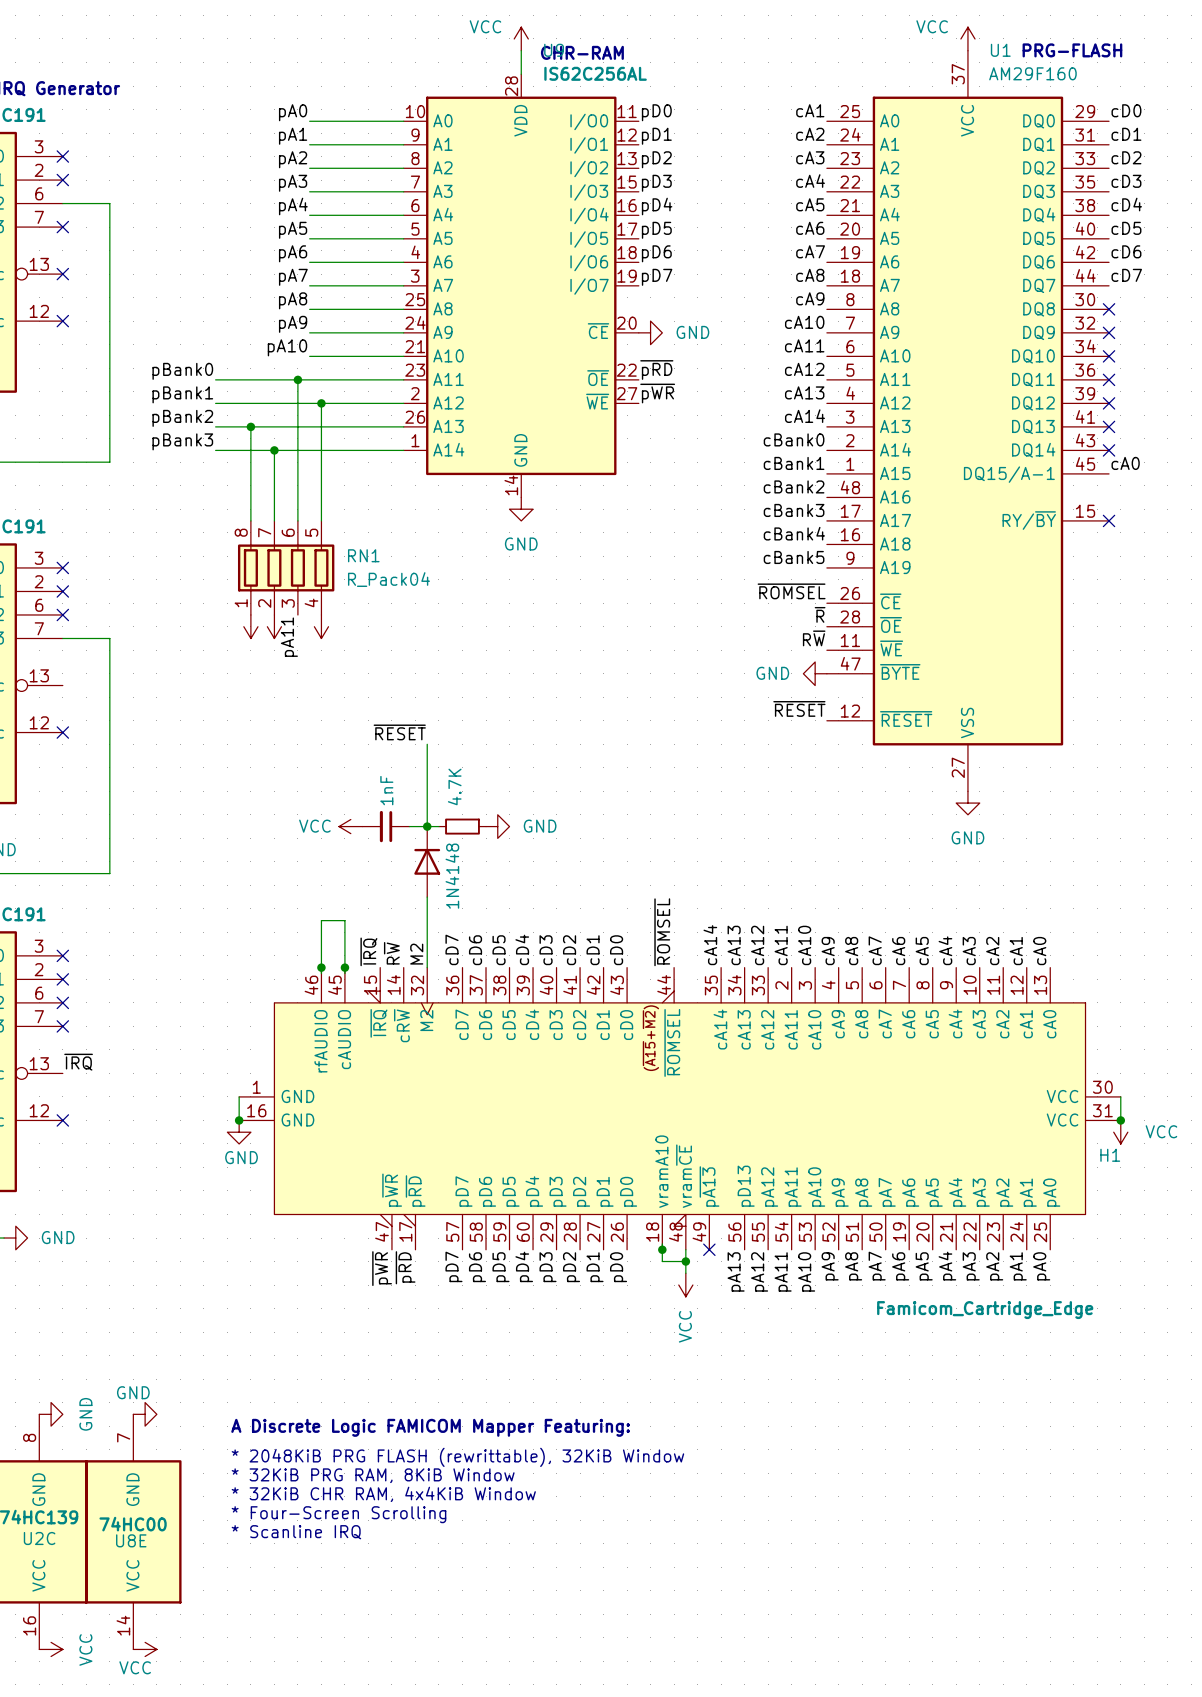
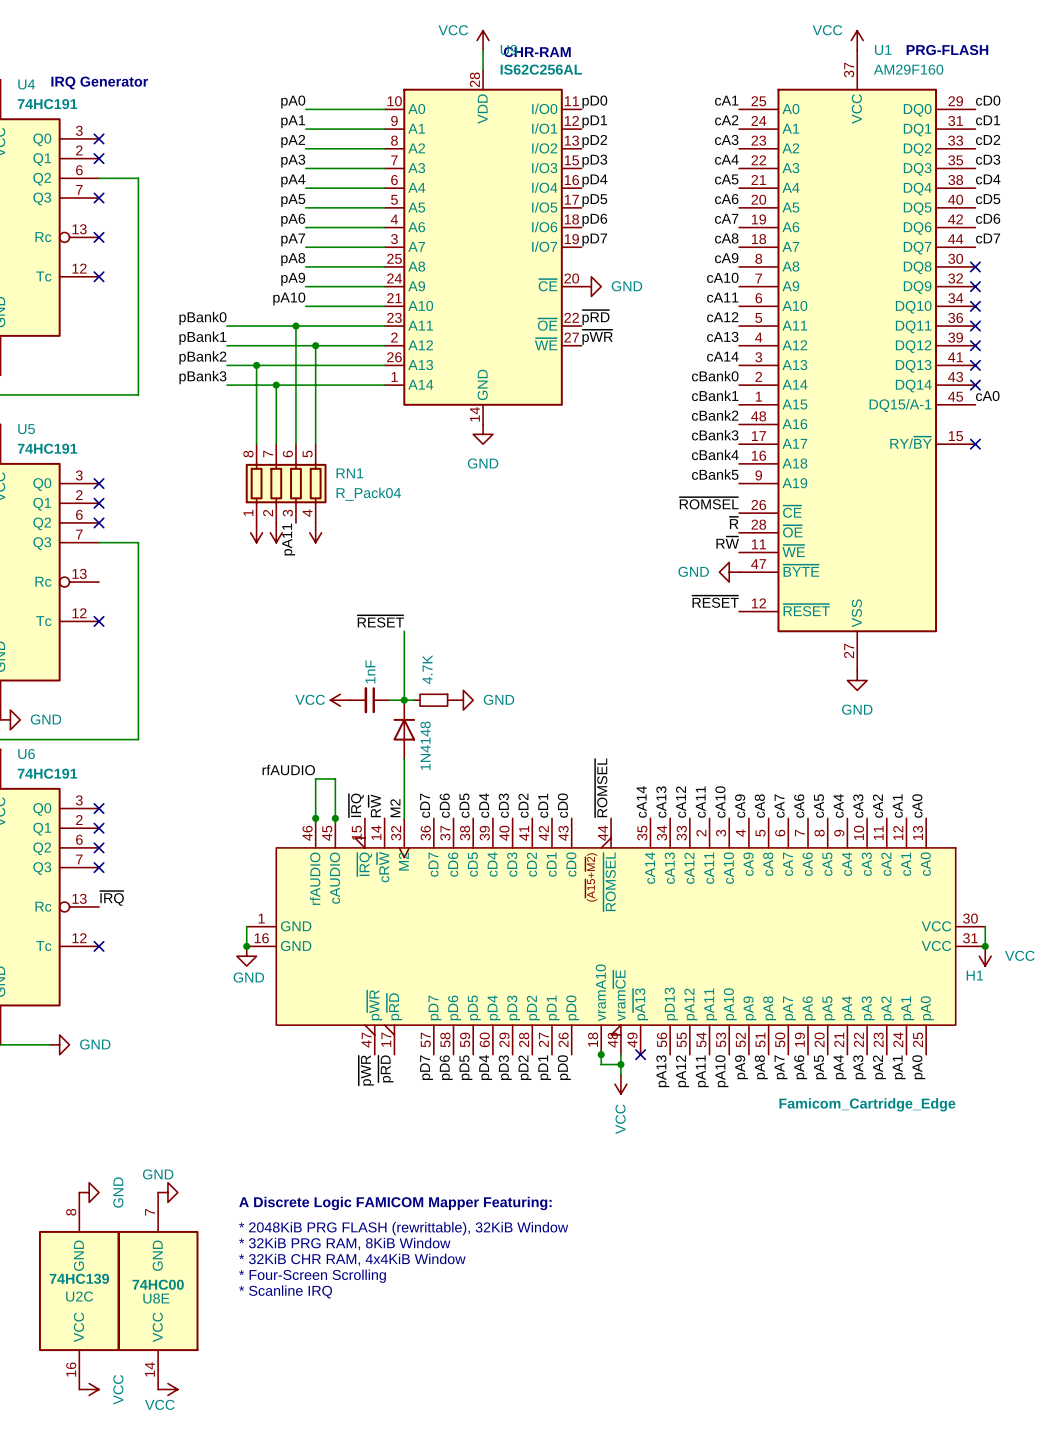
label: none -> rfAUDIO (288, 770)

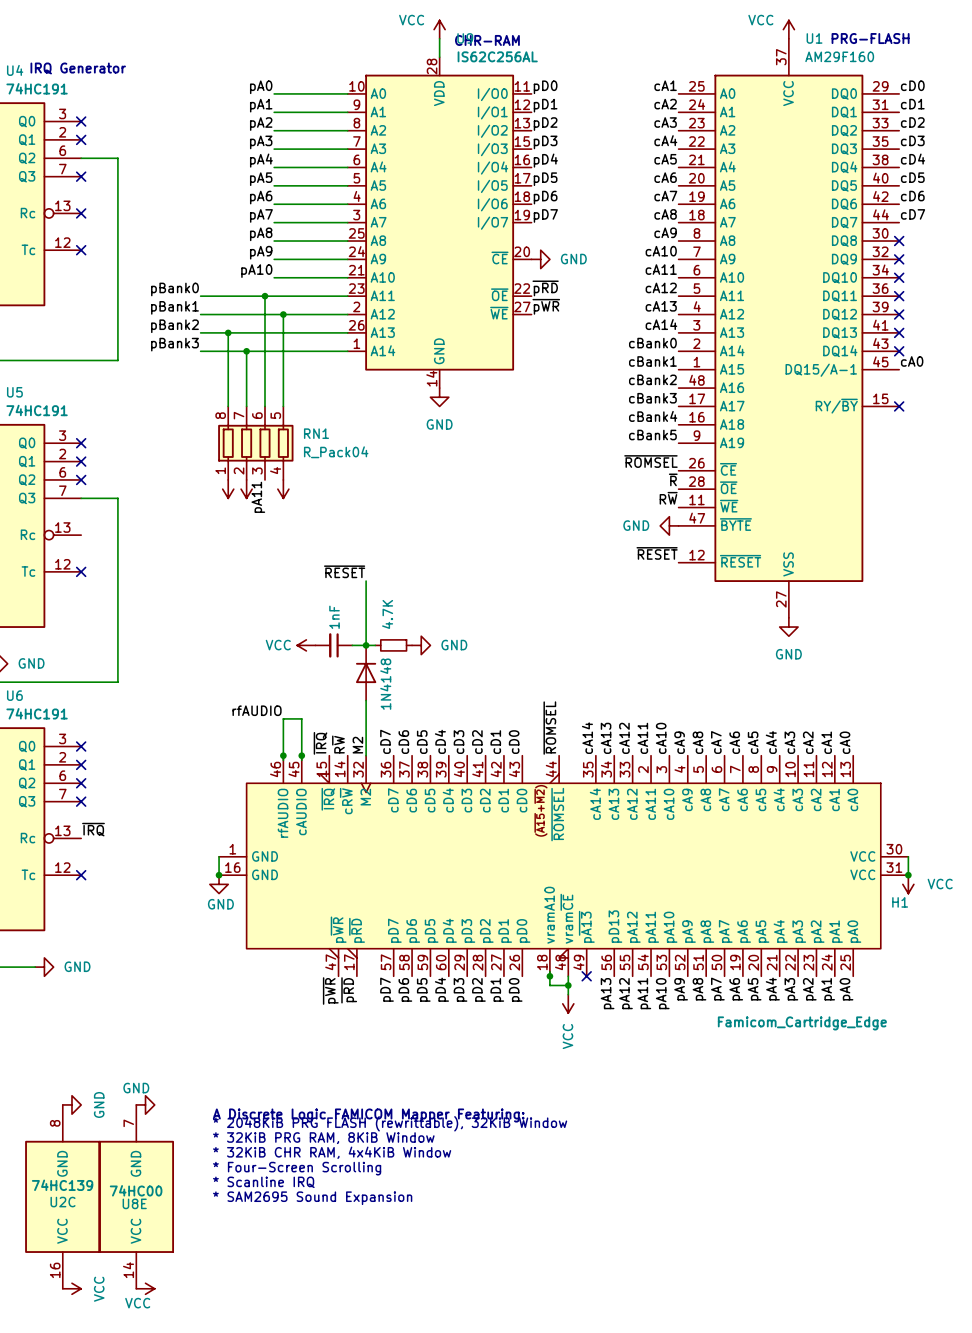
text: none -> * 2048KiB PRG FLASH (rewrittable), 32KiB Window (390, 1123)
text: * 2048KiB PRG FLASH (rewrittable), 32KiB Window (403, 1228) -> * 32KiB PRG RAM, 8KiB Window (323, 1138)
text: * 32KiB PRG RAM, 8KiB Window (344, 1243) -> * 32KiB CHR RAM, 4x4KiB Window (332, 1152)
text: * 32KiB CHR RAM, 4x4KiB Window (352, 1259) -> * Four-Screen Scrolling (297, 1168)
text: * Four-Screen Scrolling (312, 1276) -> * Scanline IRQ (263, 1182)
text: * Scanline IRQ (285, 1291) -> * SAM2695 Sound Expansion (312, 1198)

